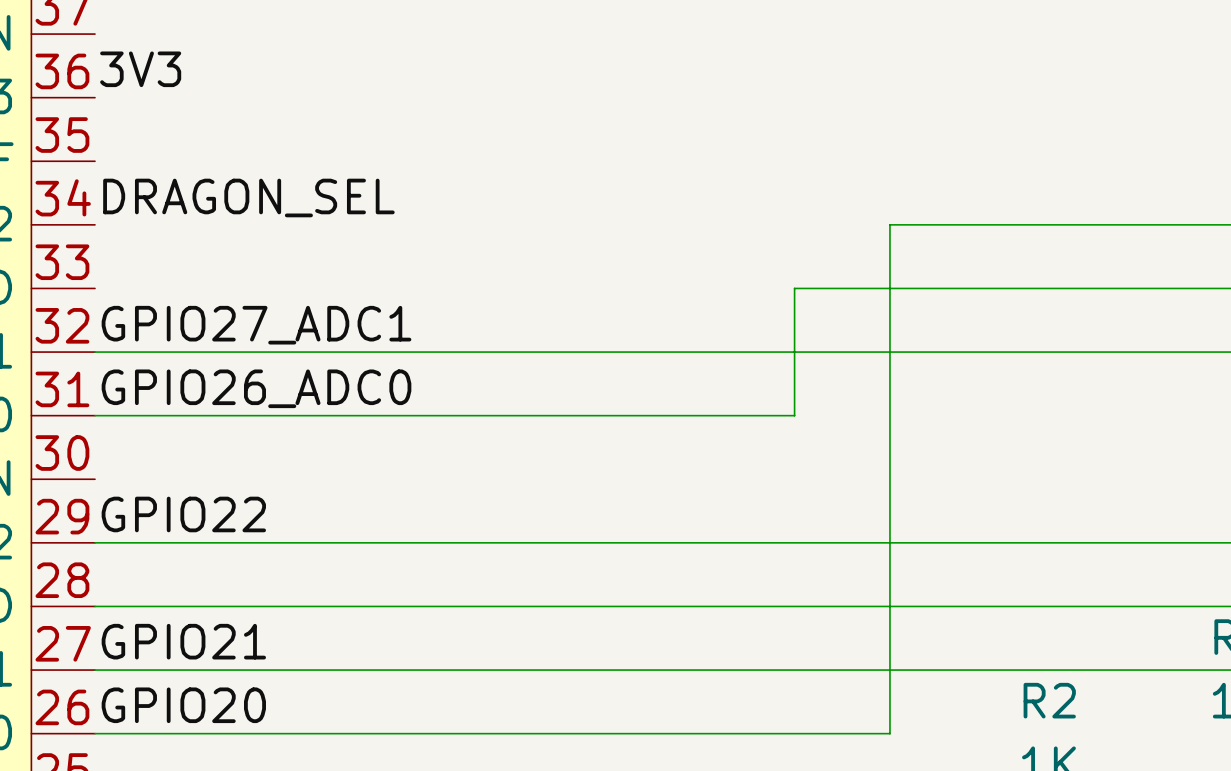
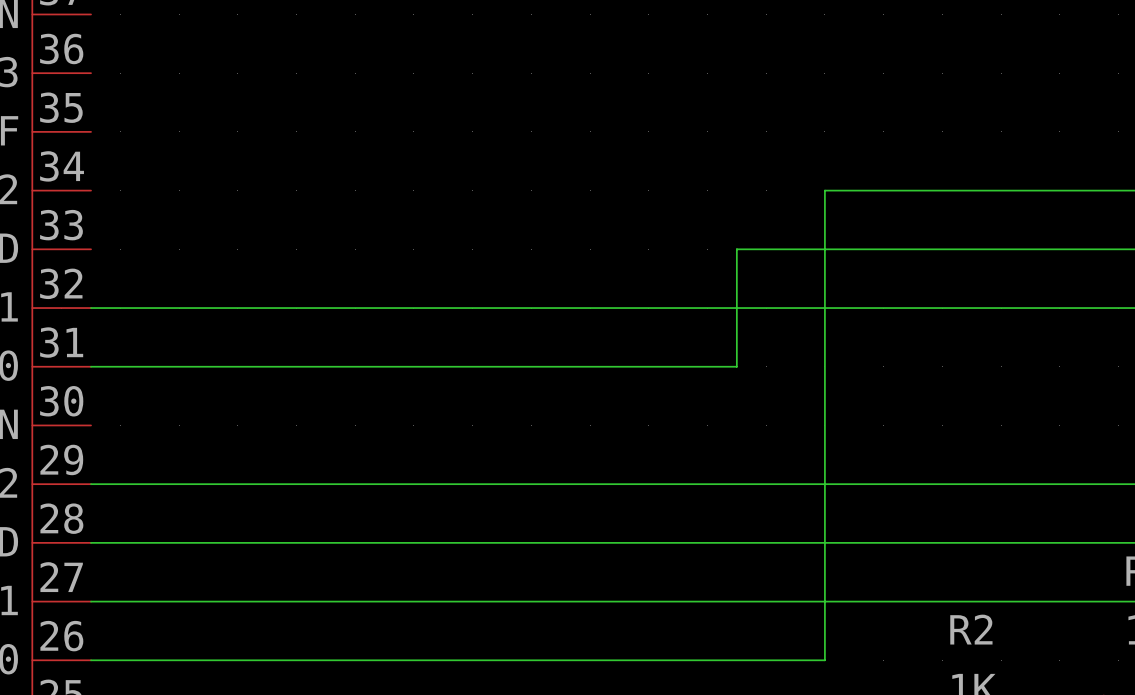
label: 3V3 (140, 69) -> none
label: DRAGON_SEL (248, 197) -> none
label: GPIO27_ADC1 (256, 325) -> none
label: GPIO26_ADC0 (256, 388) -> none
label: GPIO22 (183, 514) -> none
label: GPIO21 (183, 641) -> none
label: GPIO20 (183, 705) -> none

